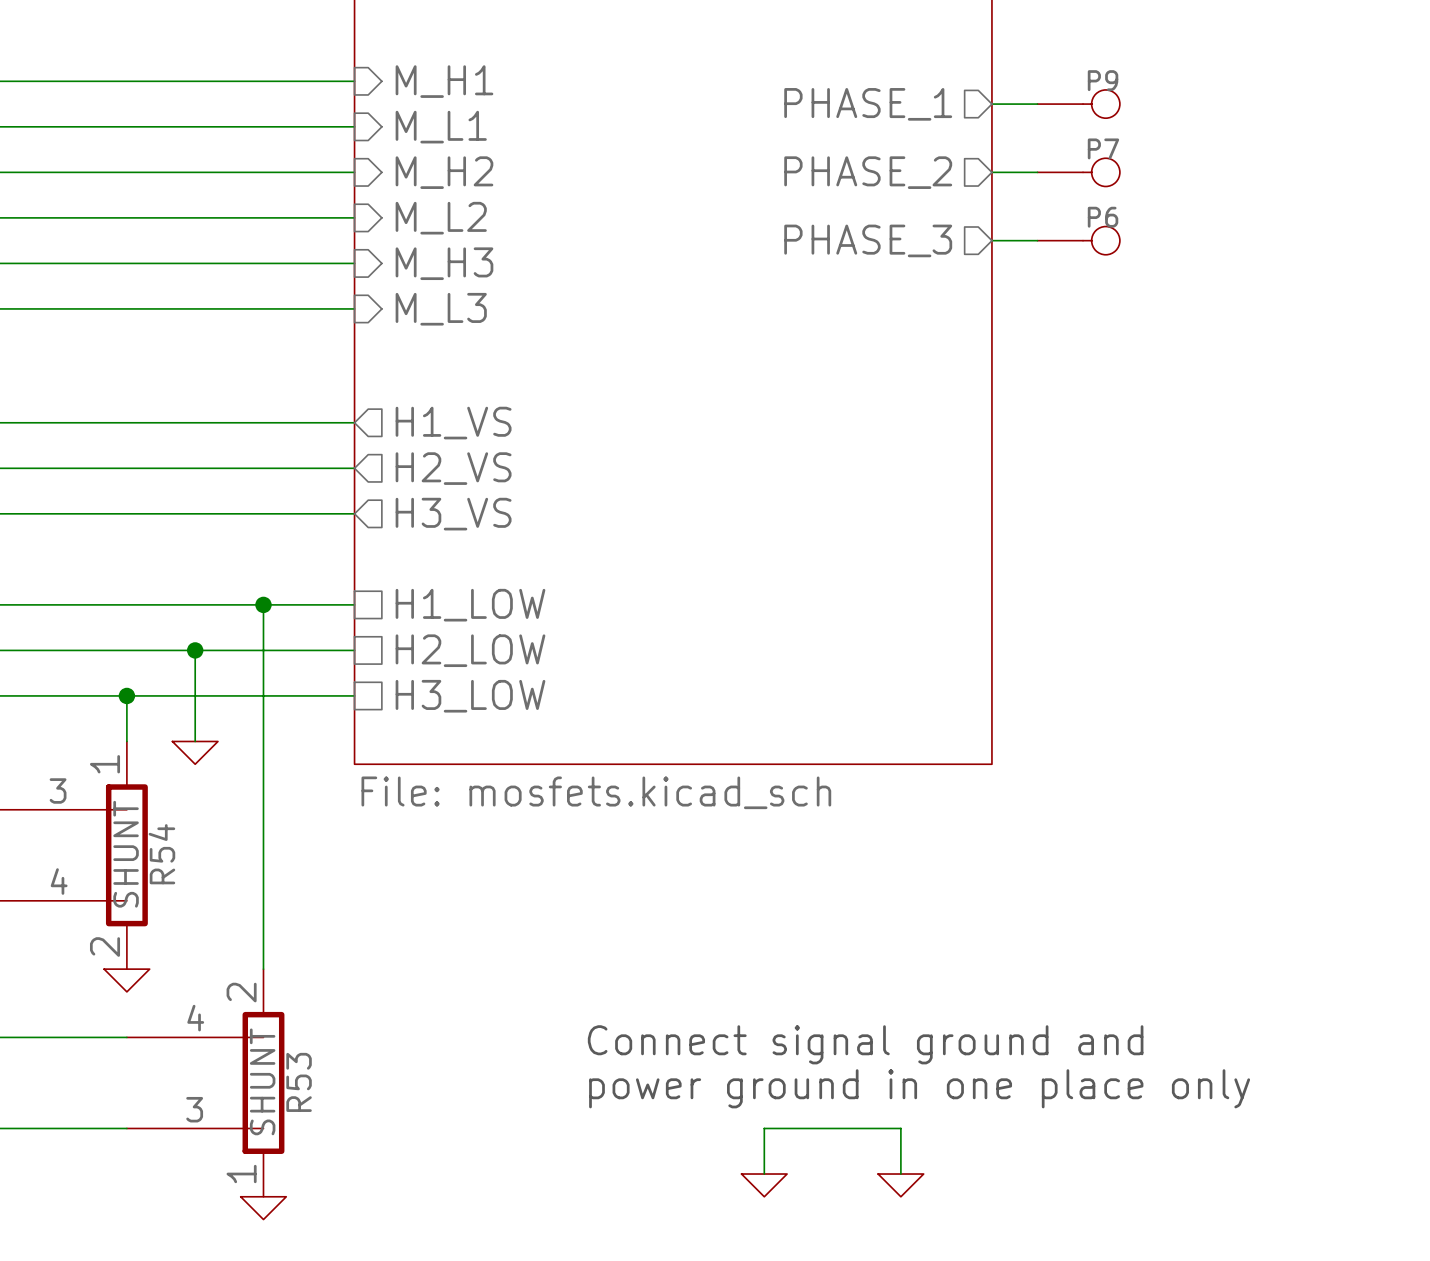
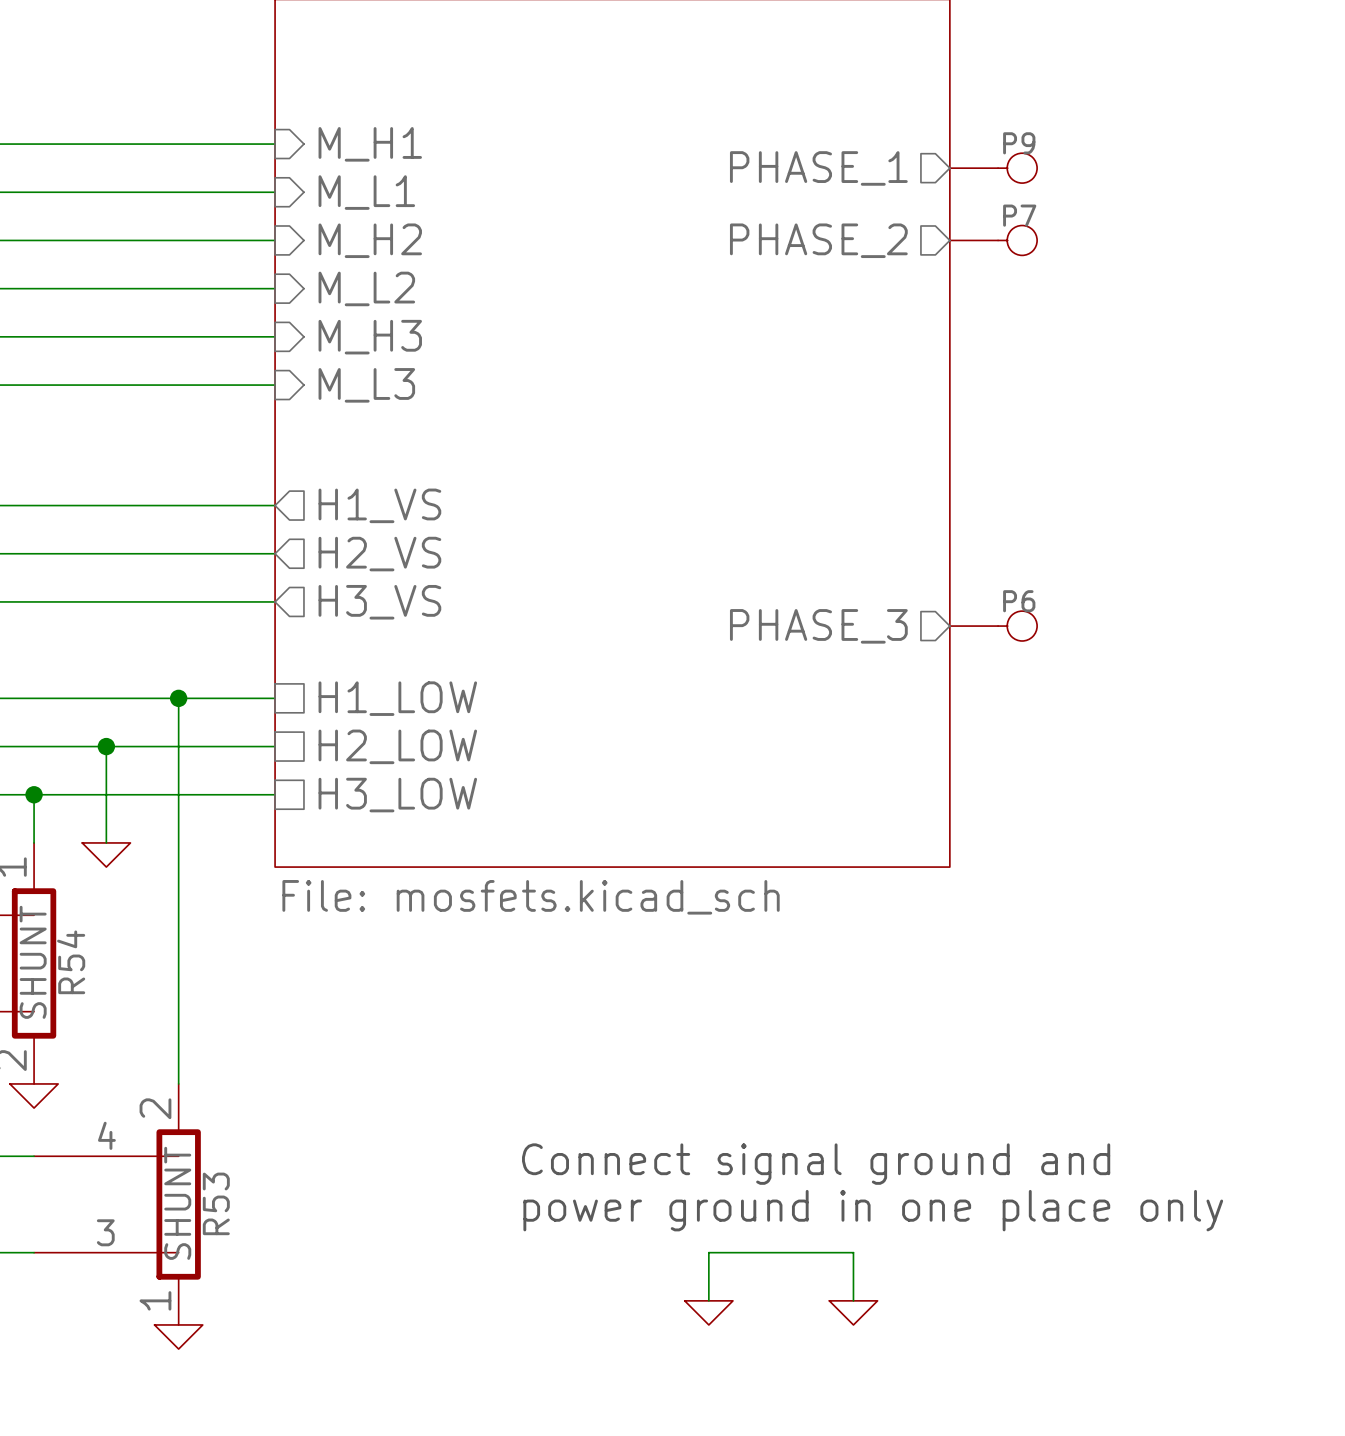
P9 position: (1078, 104) -> (993, 168)
P7 position: (1078, 172) -> (993, 240)
sheet pin position: PHASE_3 (868, 240) -> PHASE_3 (818, 626)
wire: (991, 240) (1037, 240) -> none
P6 position: (1078, 240) -> (993, 626)

